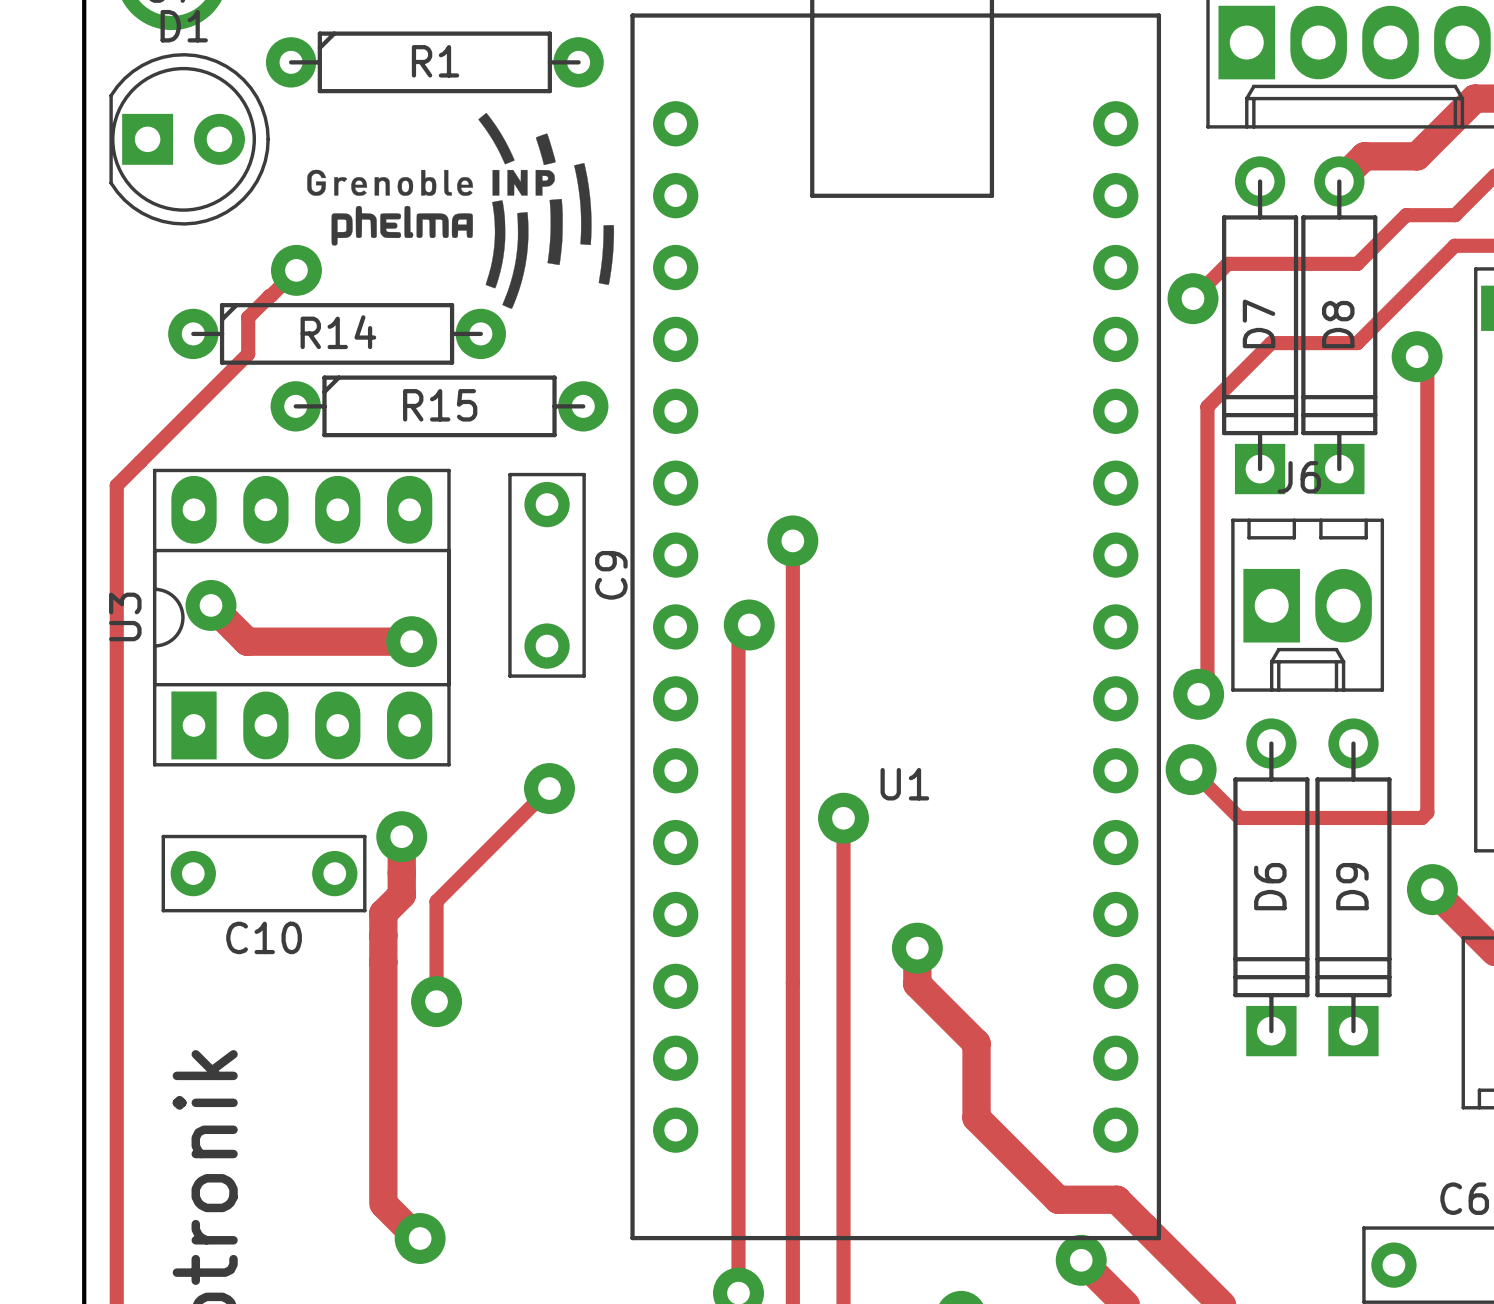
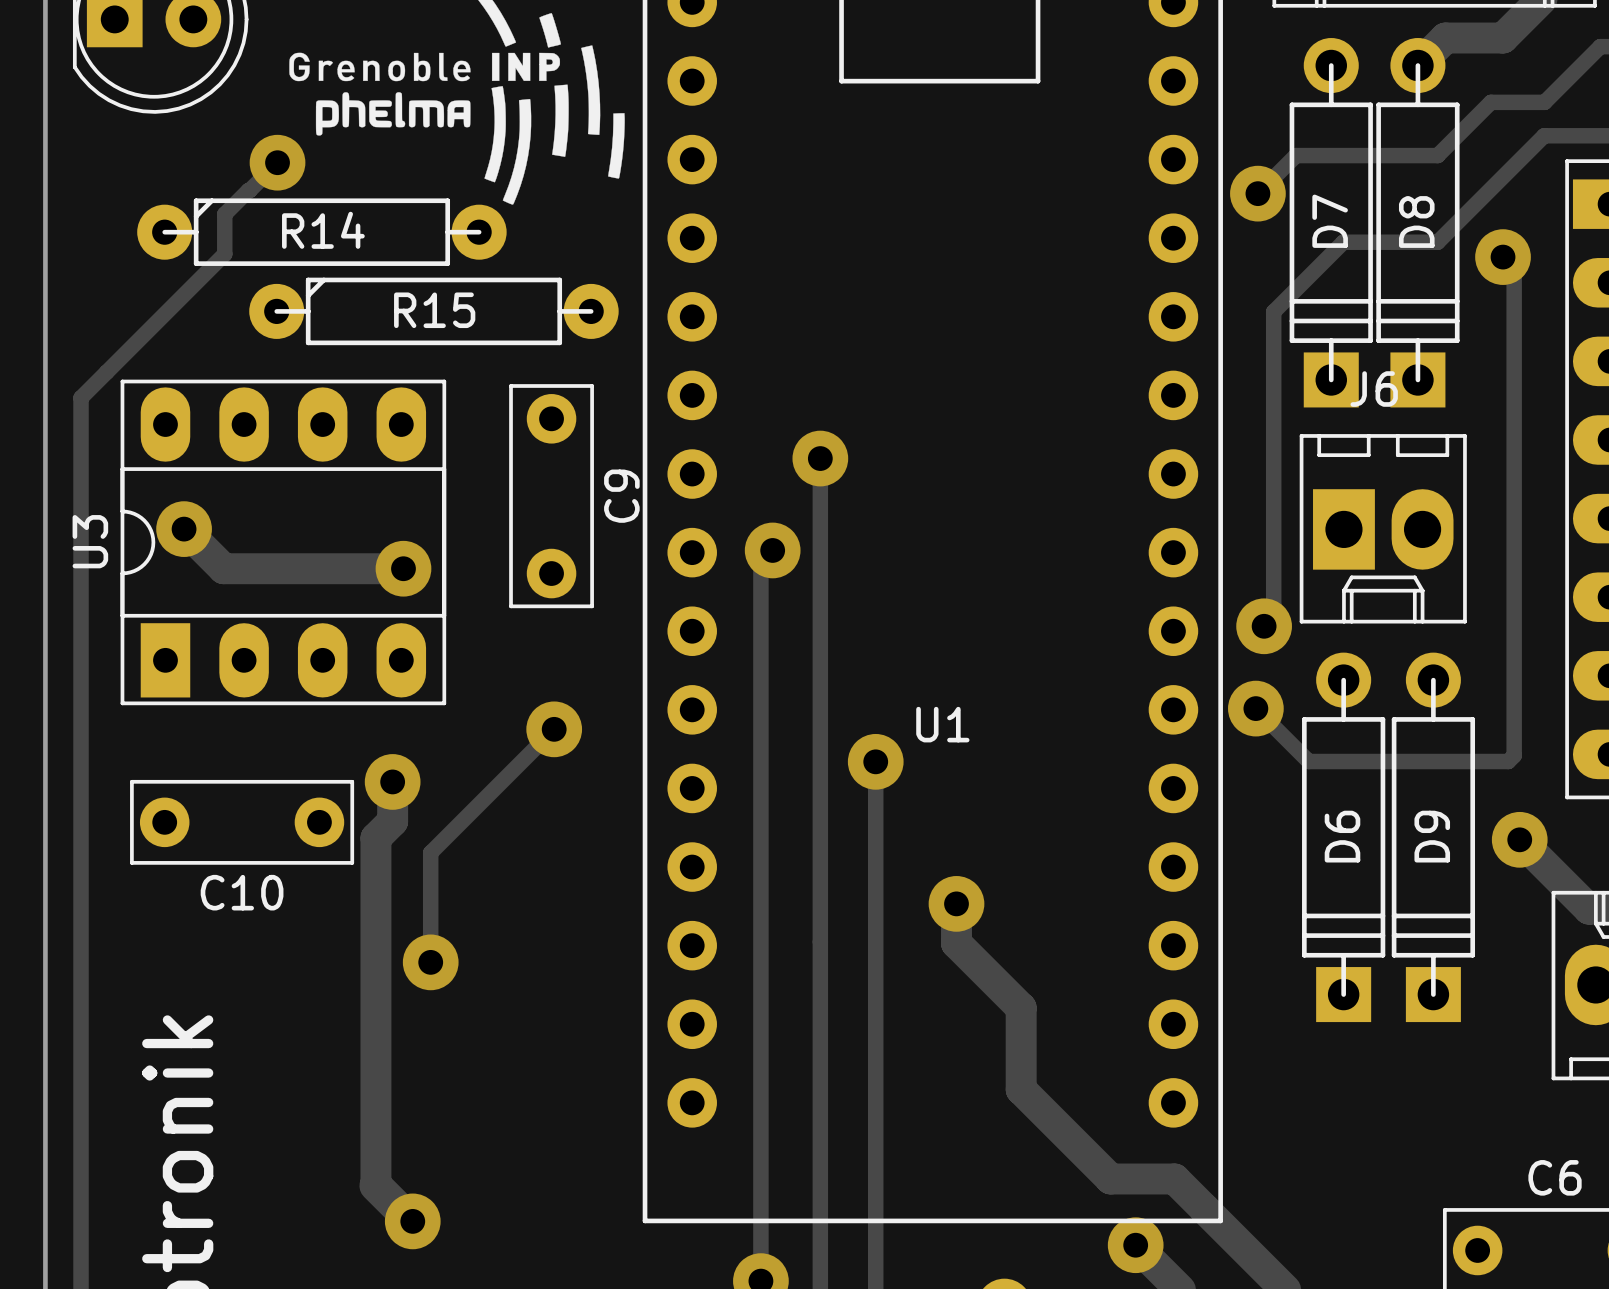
track: (401, 872) (401, 895) (383, 913) (383, 1203) -> (392, 821) (375, 838) (375, 1184) (412, 1221)

